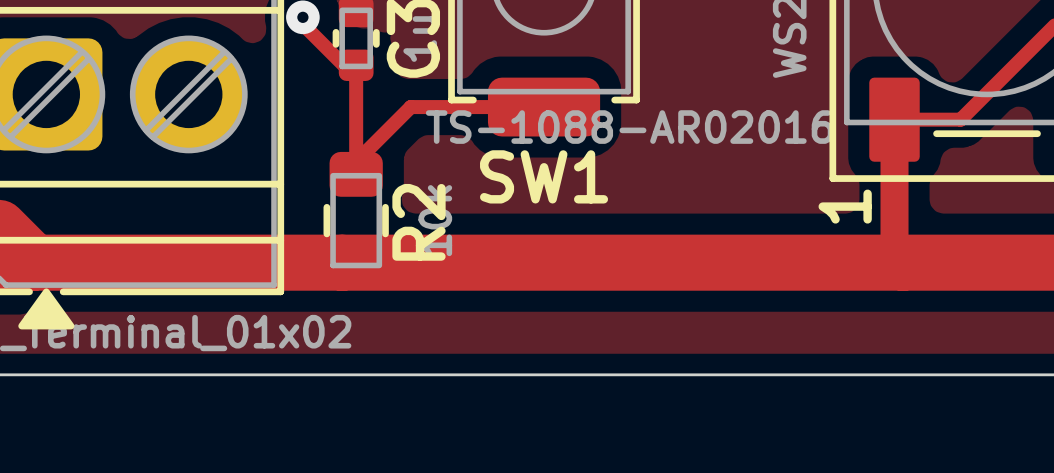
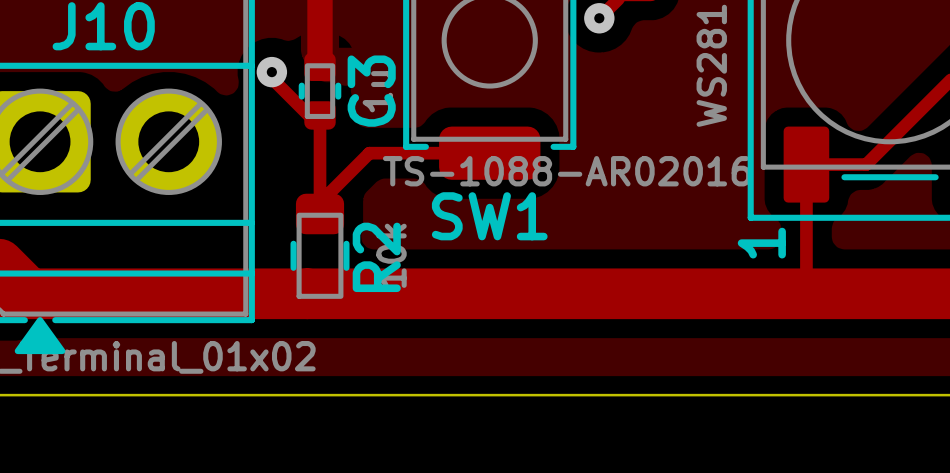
track width: thick (894, 119) (894, 254) -> thin (806, 164) (806, 286)

